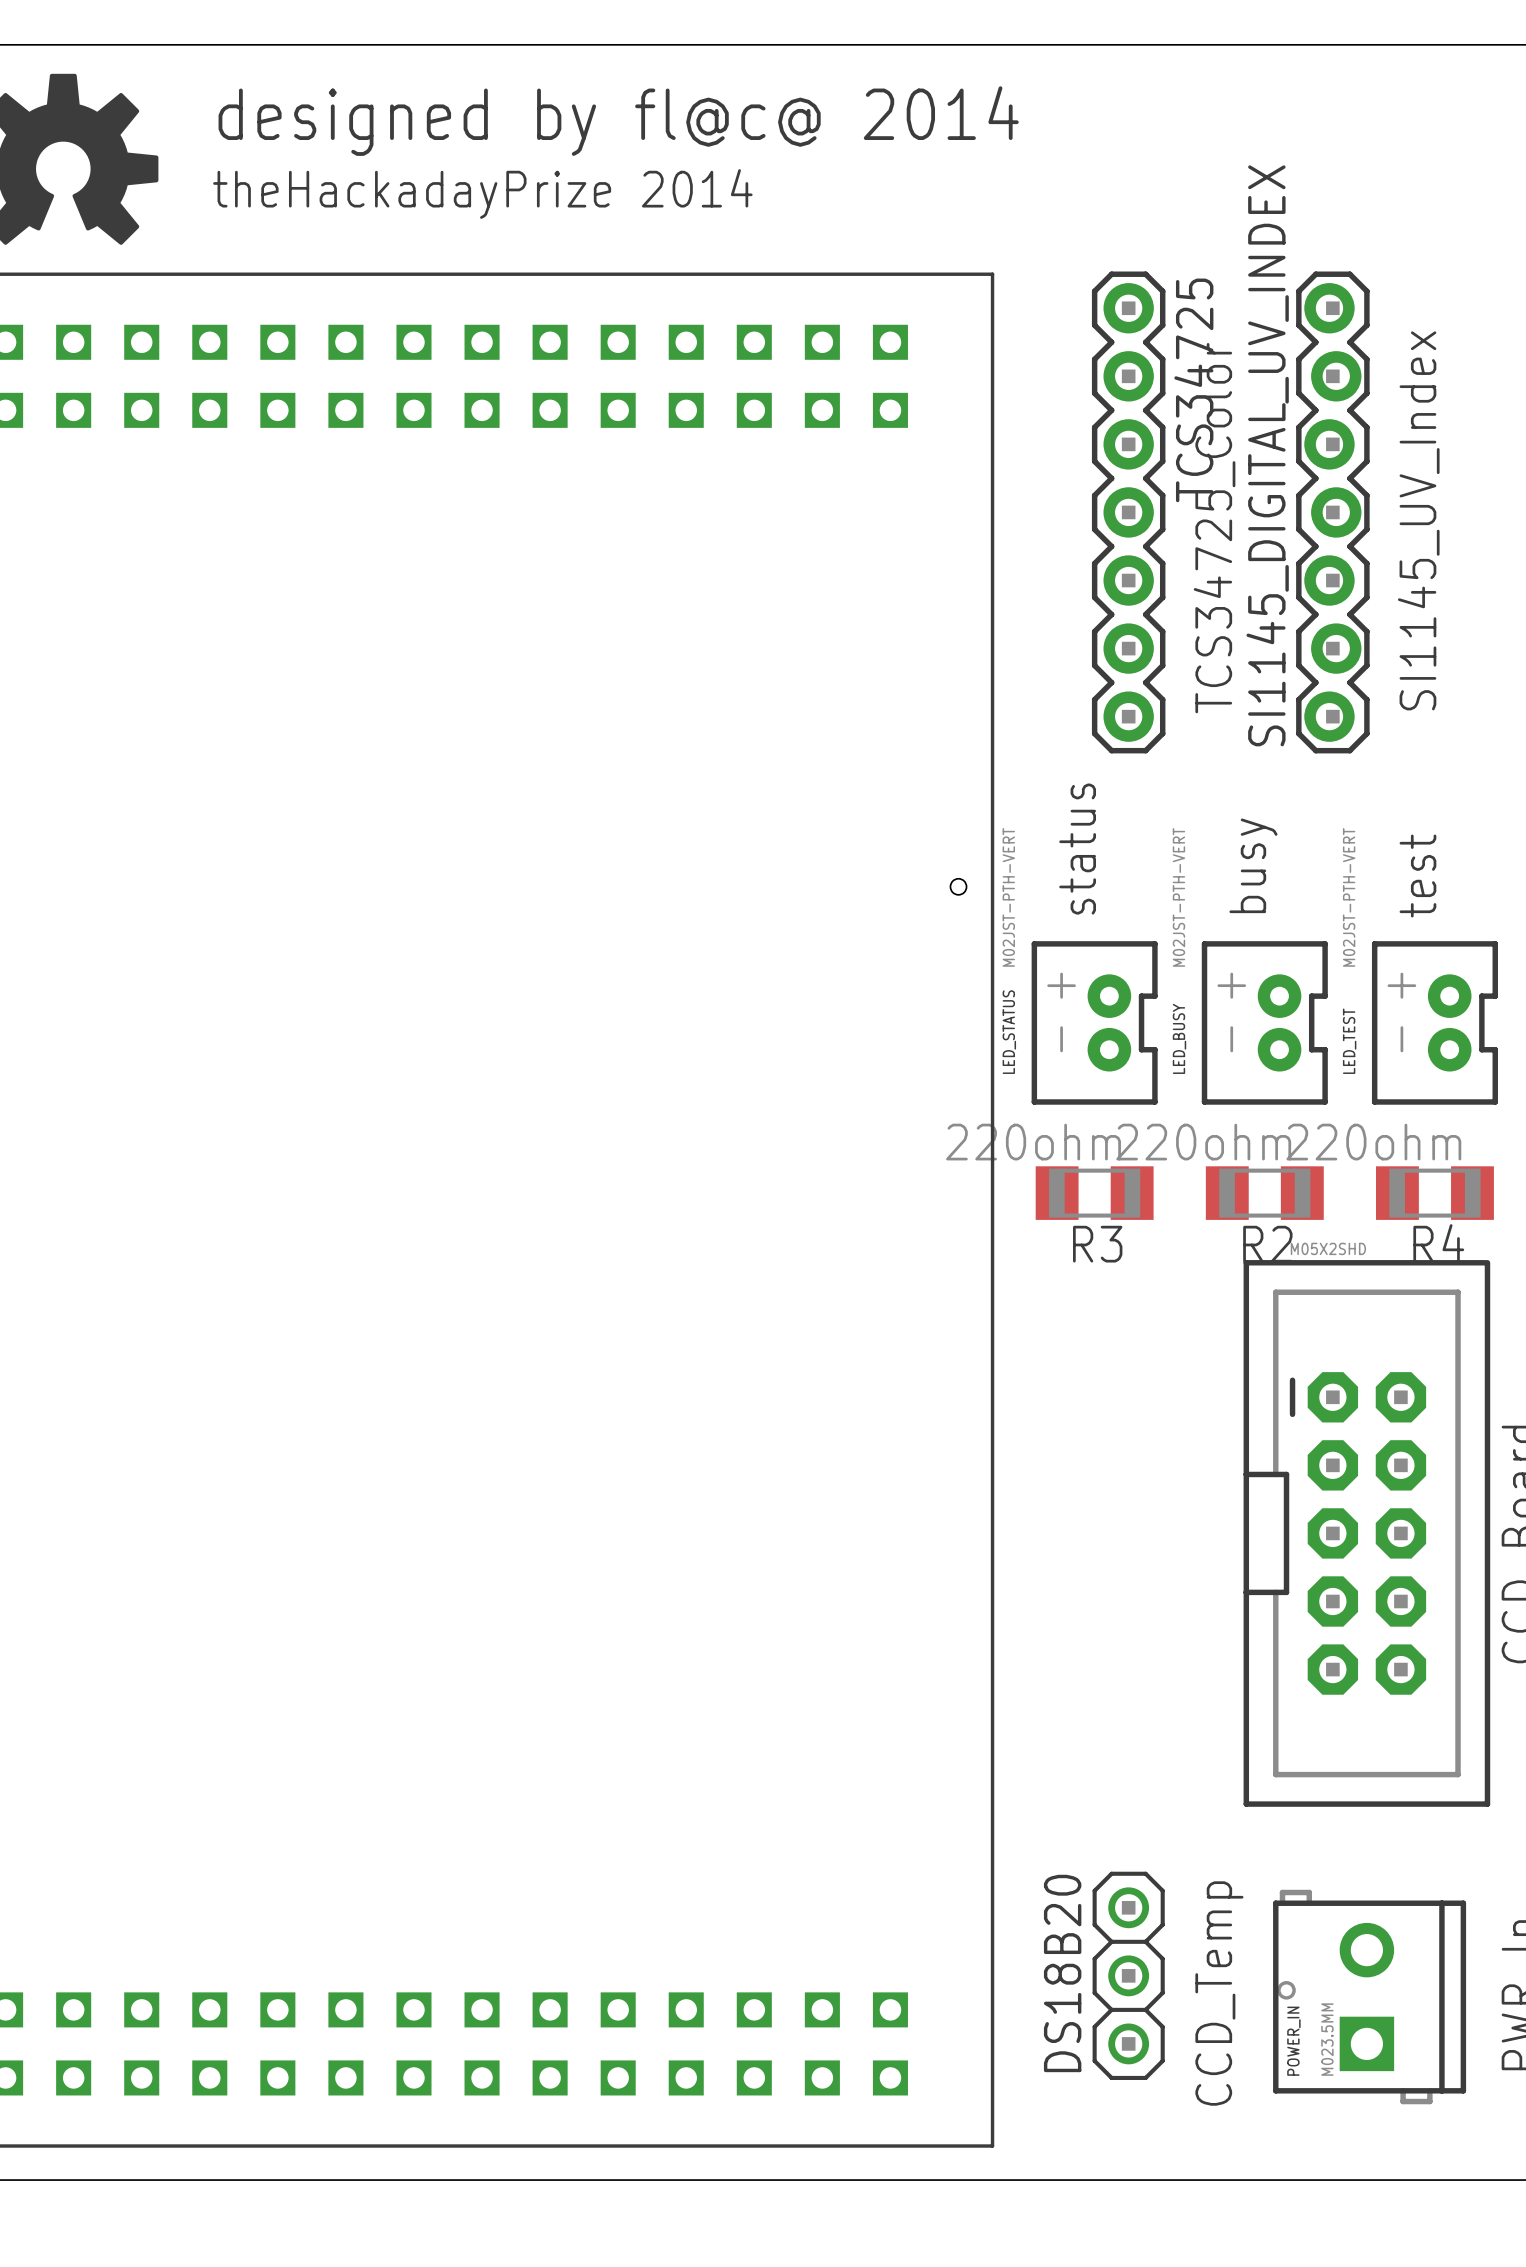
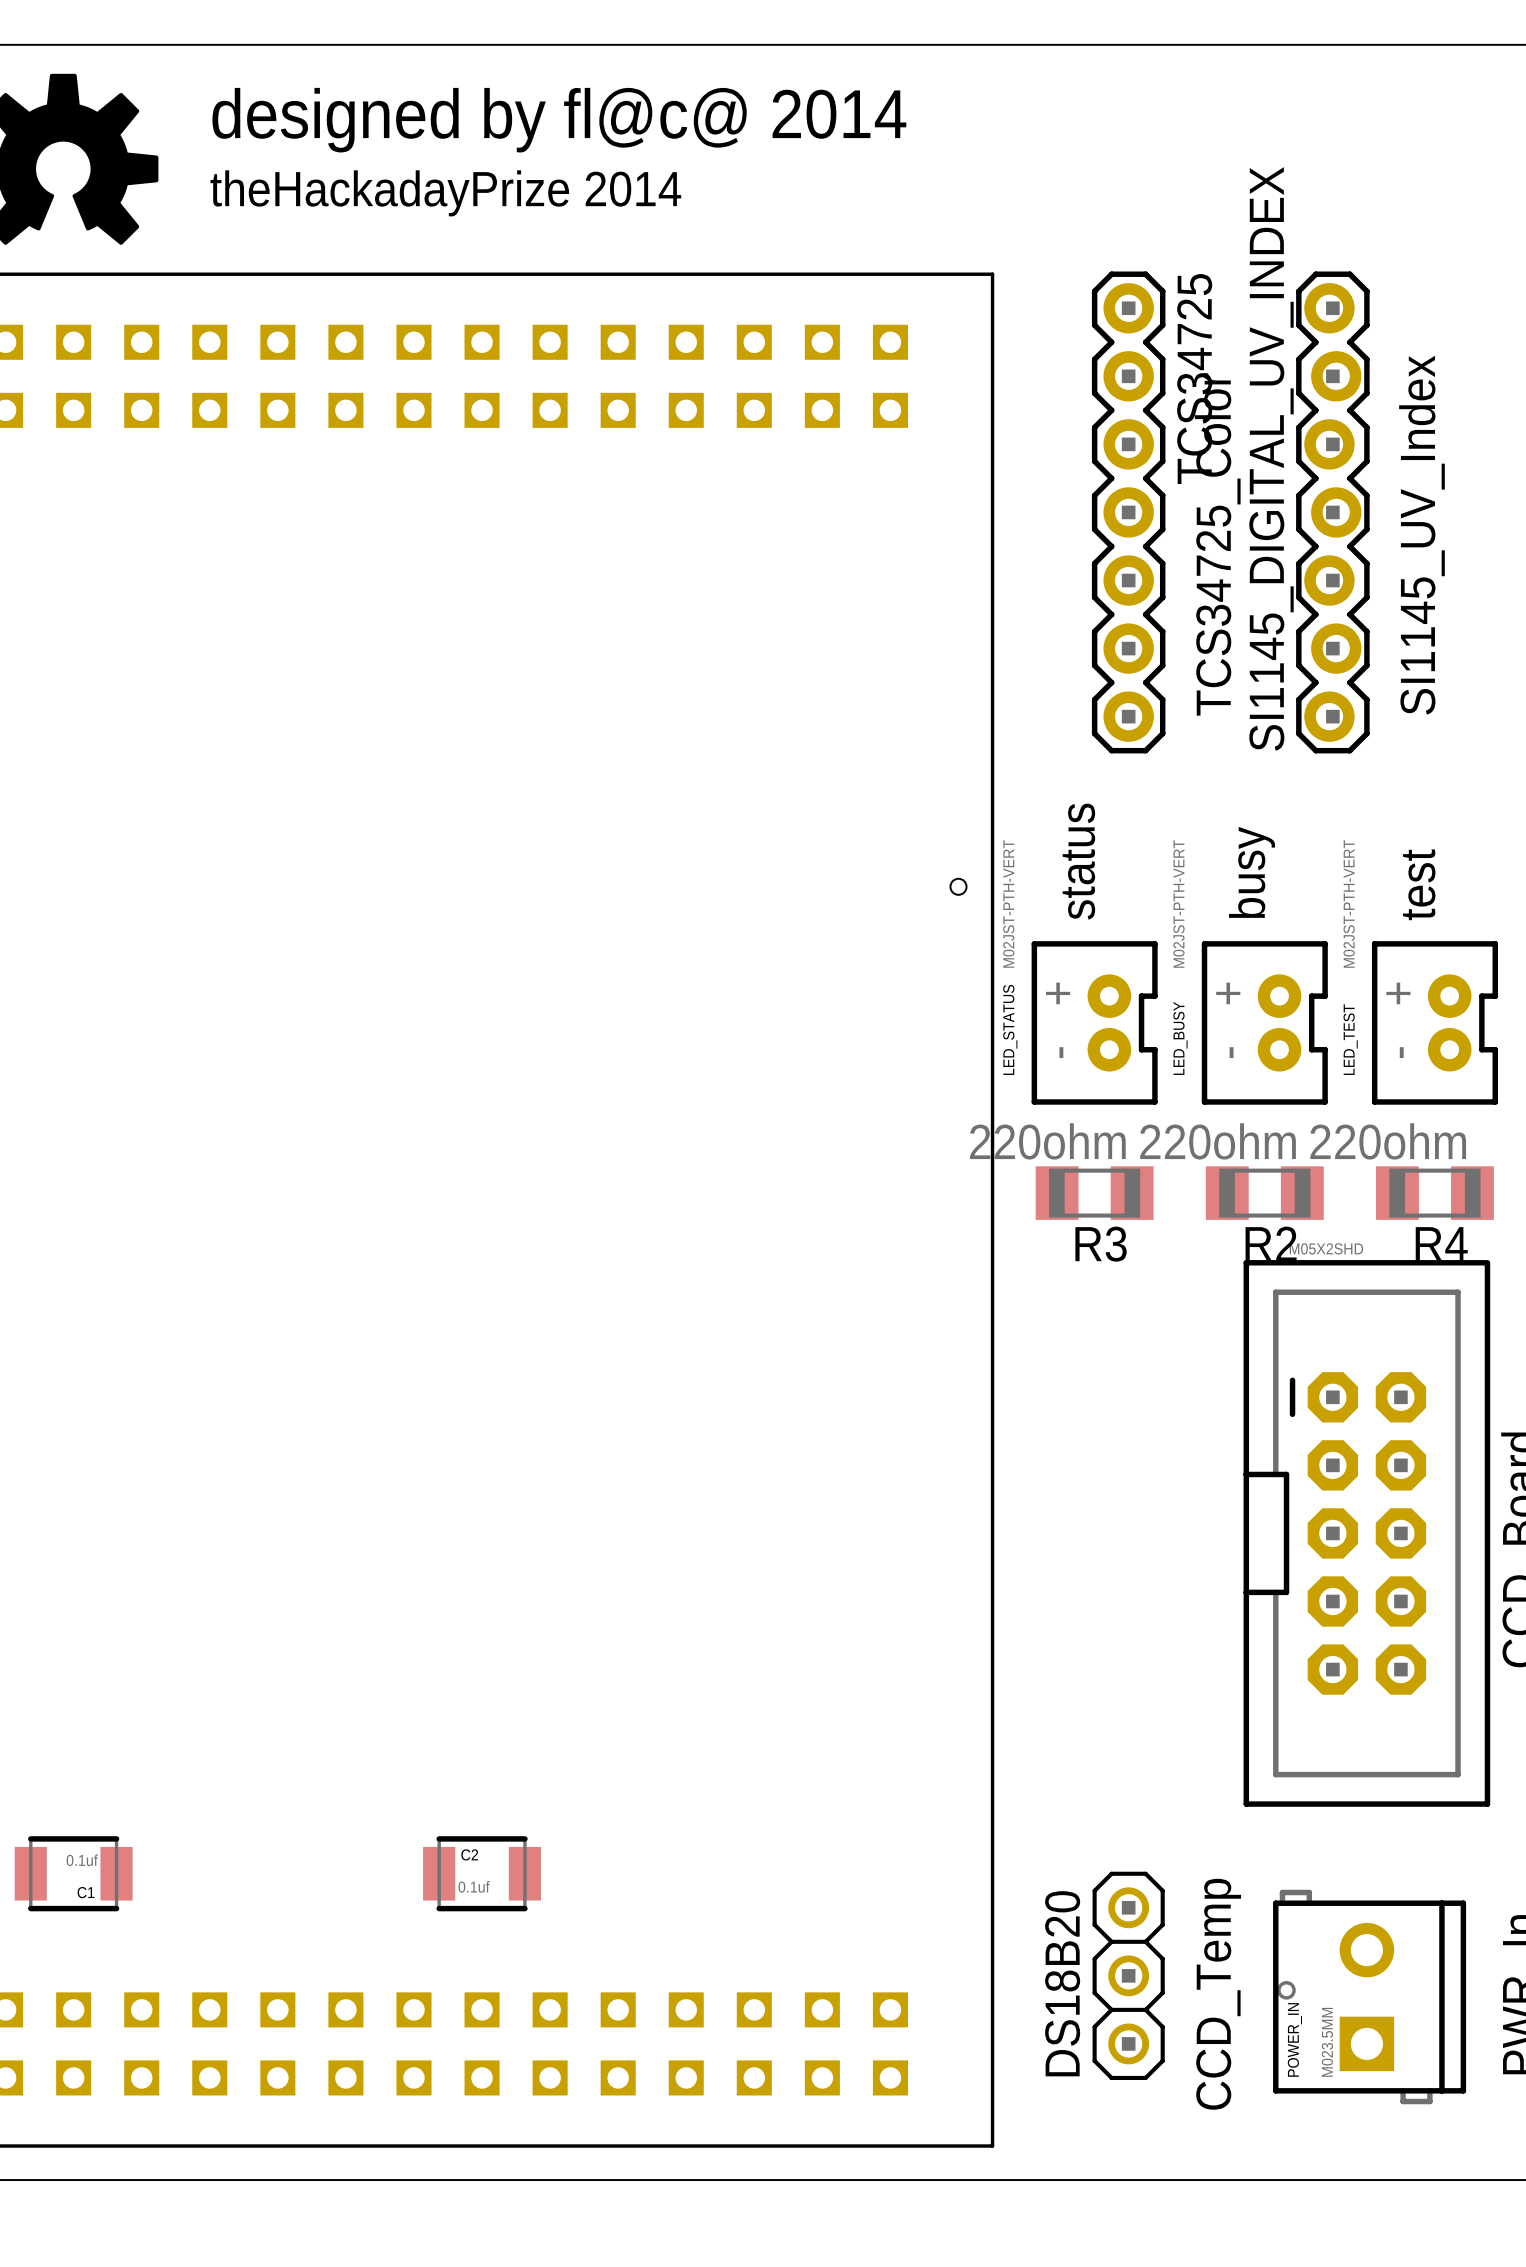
C1: none -> 0.1uf (73, 1873)
C2: none -> 0.1uf (482, 1873)

